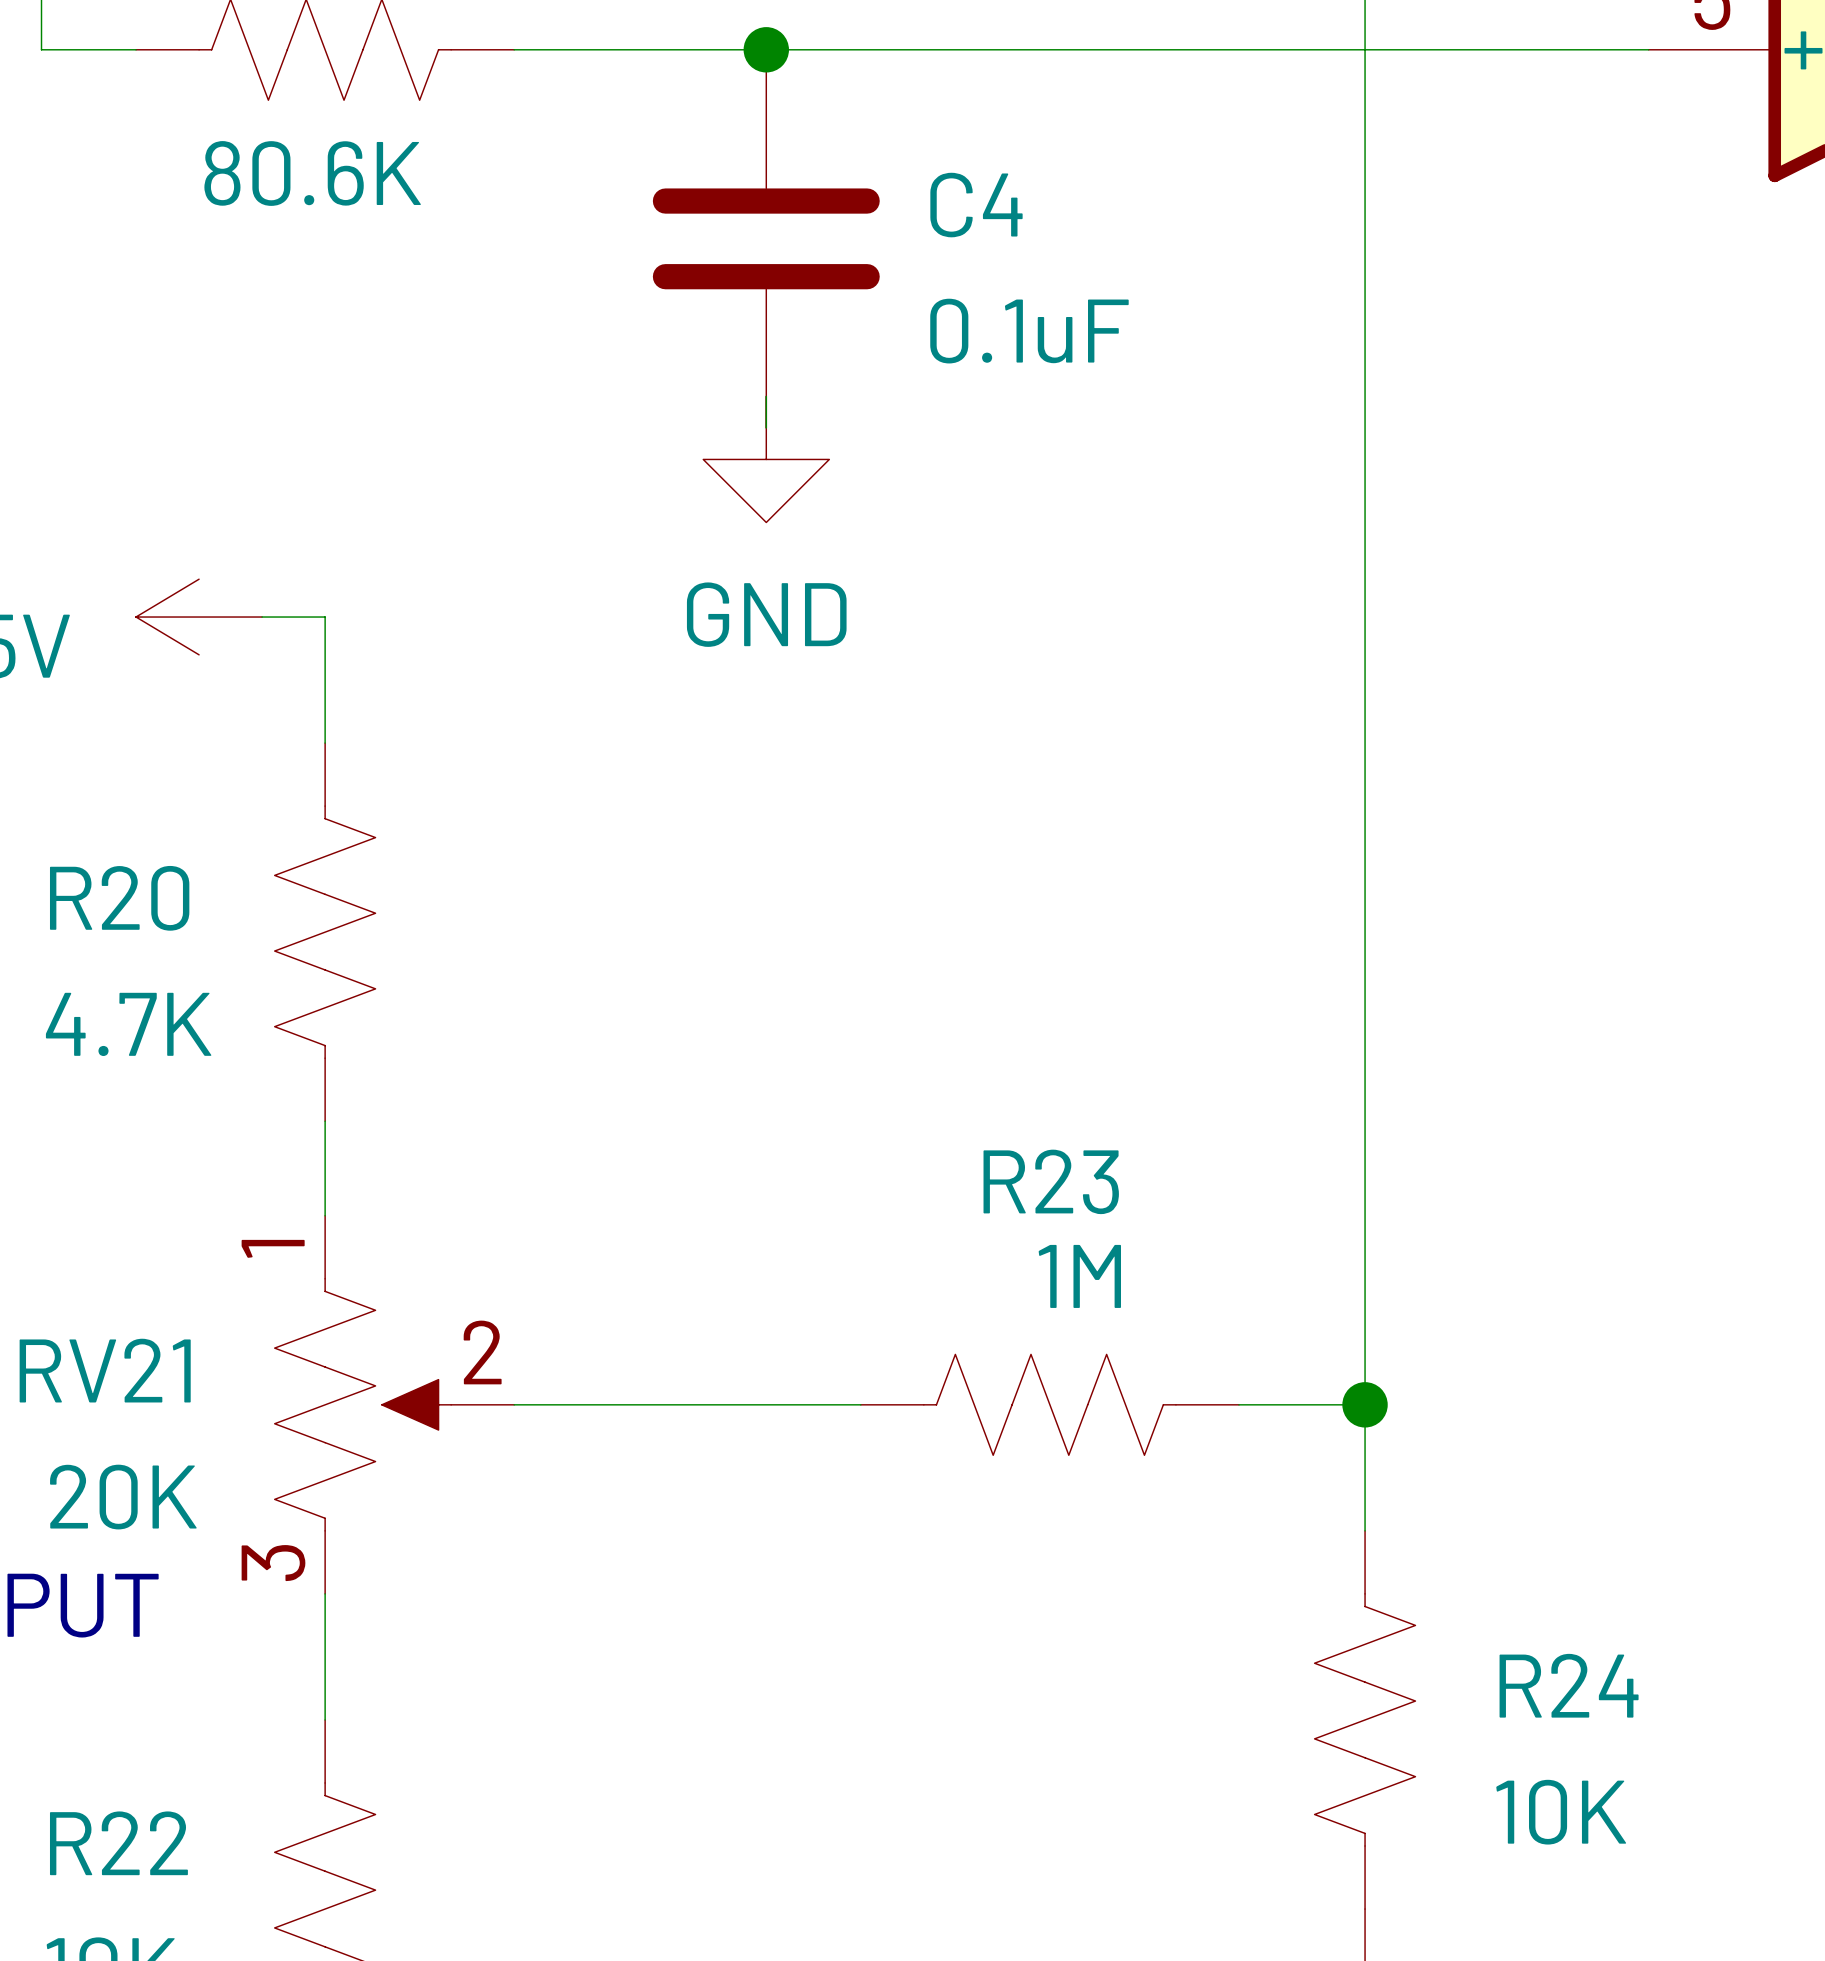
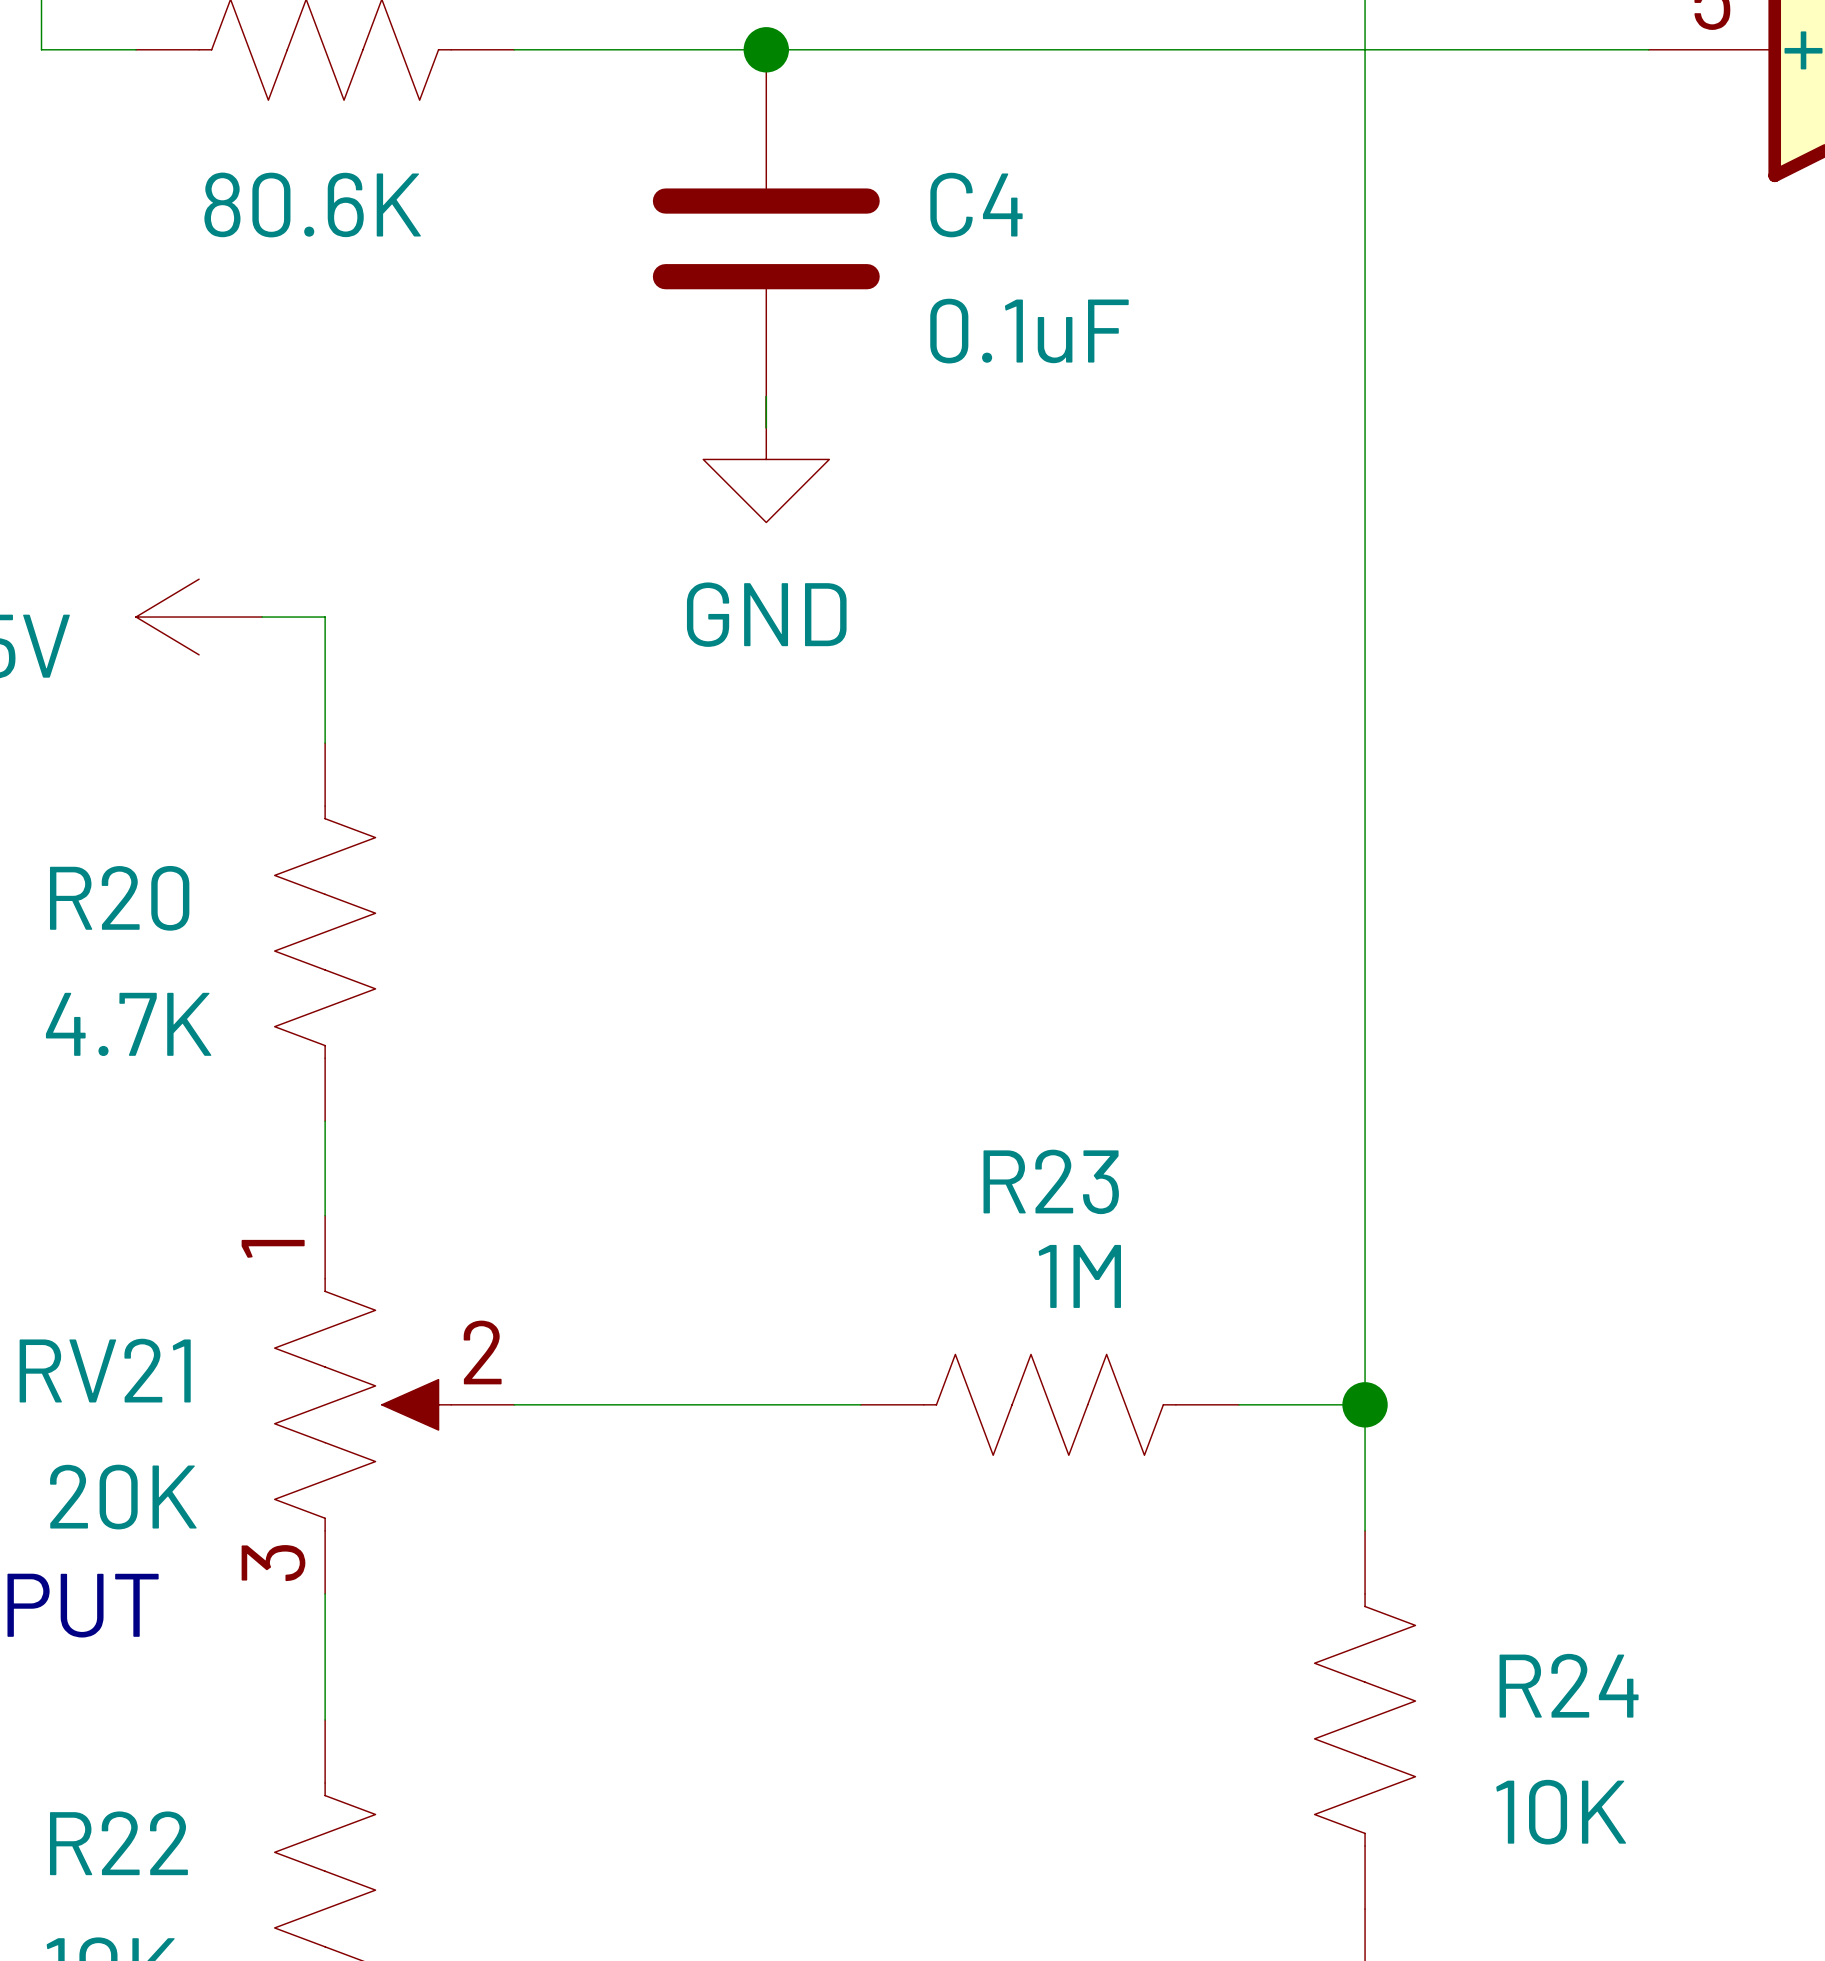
part value position: 80.6K (312, 173) -> 80.6K (312, 204)

